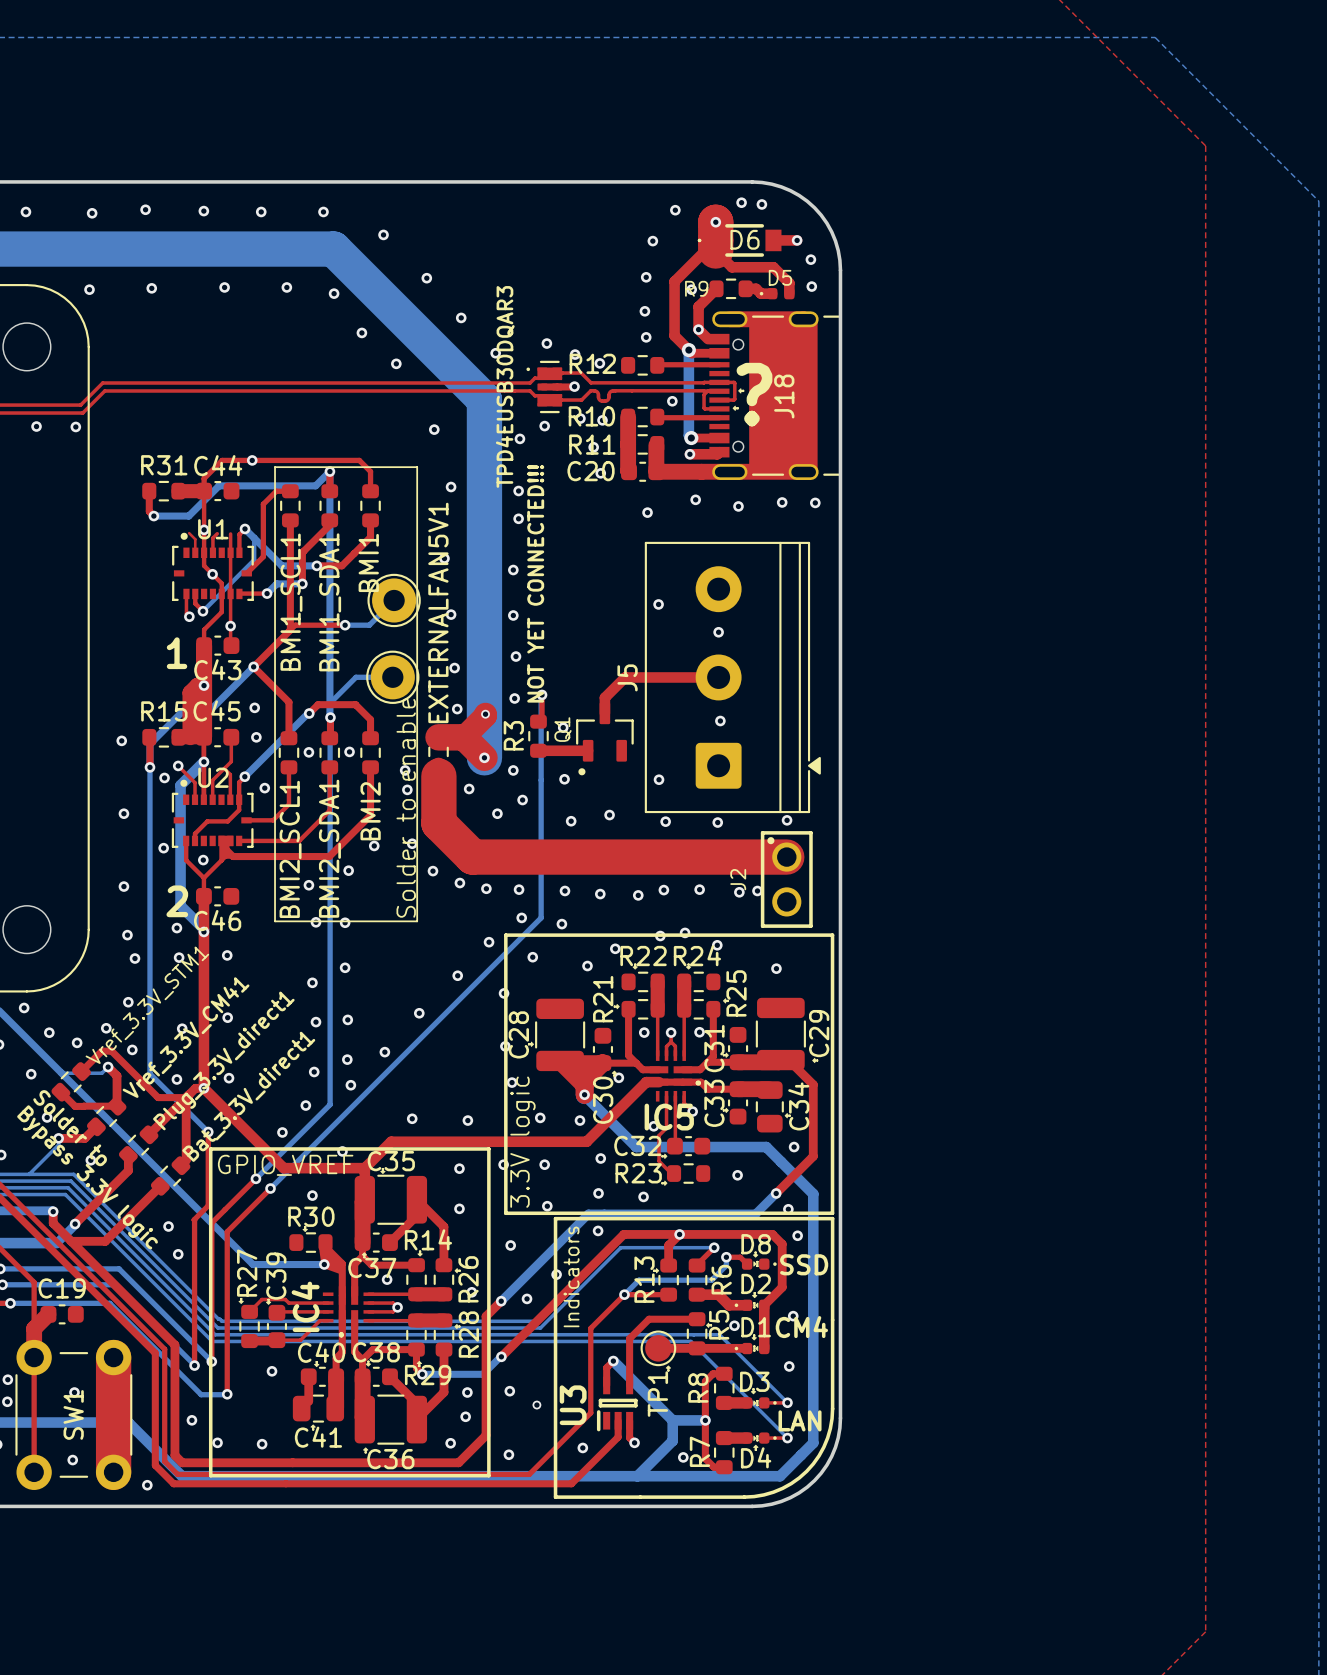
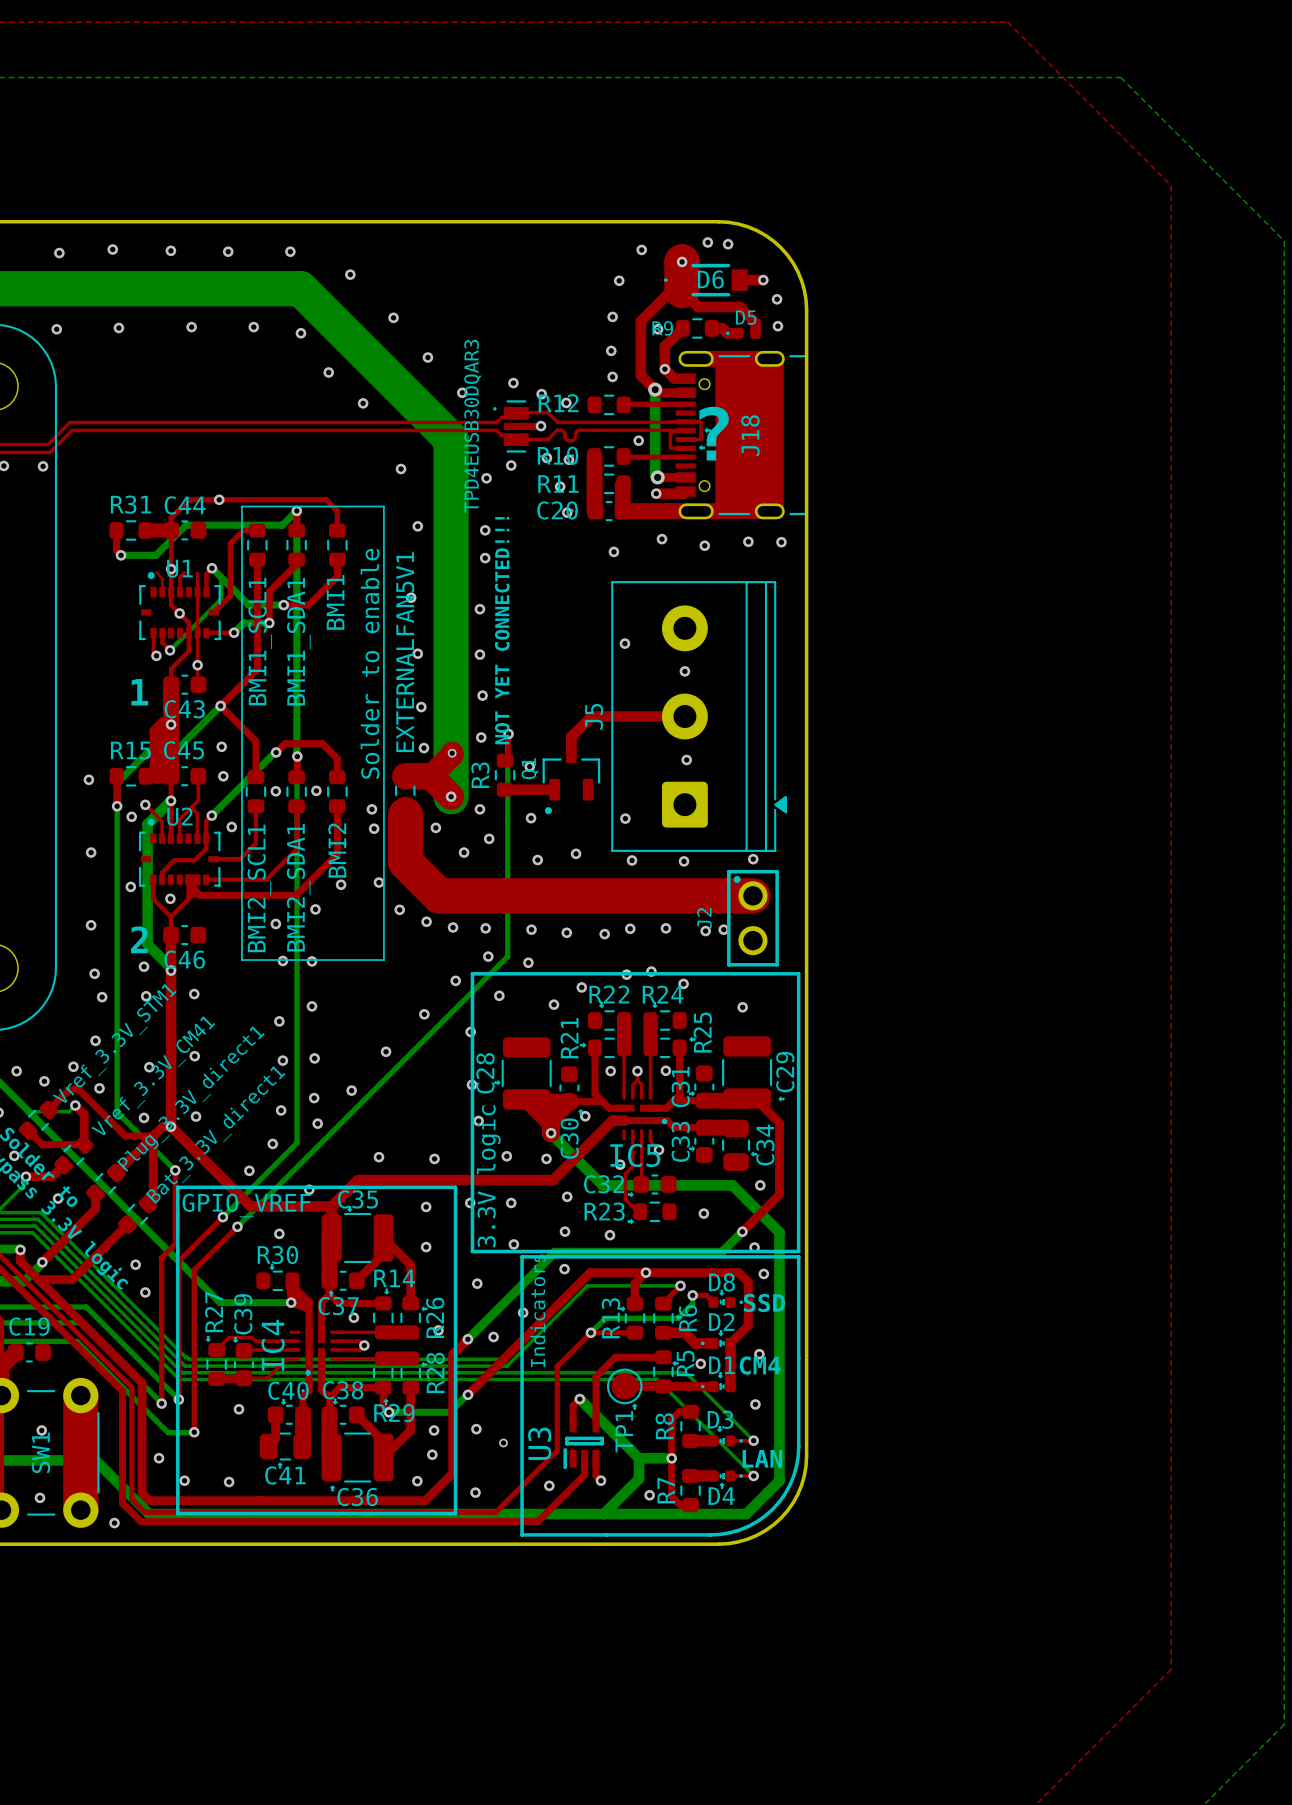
bottom track: (394, 600) (369, 625) (345, 625) -> none
part: (394, 600) -> none
top track: (345, 625) (295, 625) (290, 630) -> none
via: (345, 625) -> none
bottom track: (392, 677) (355, 677) (329, 703) -> none
part: (392, 677) -> none
text position: Solder to enable (406, 807) -> Solder to enable (370, 663)

